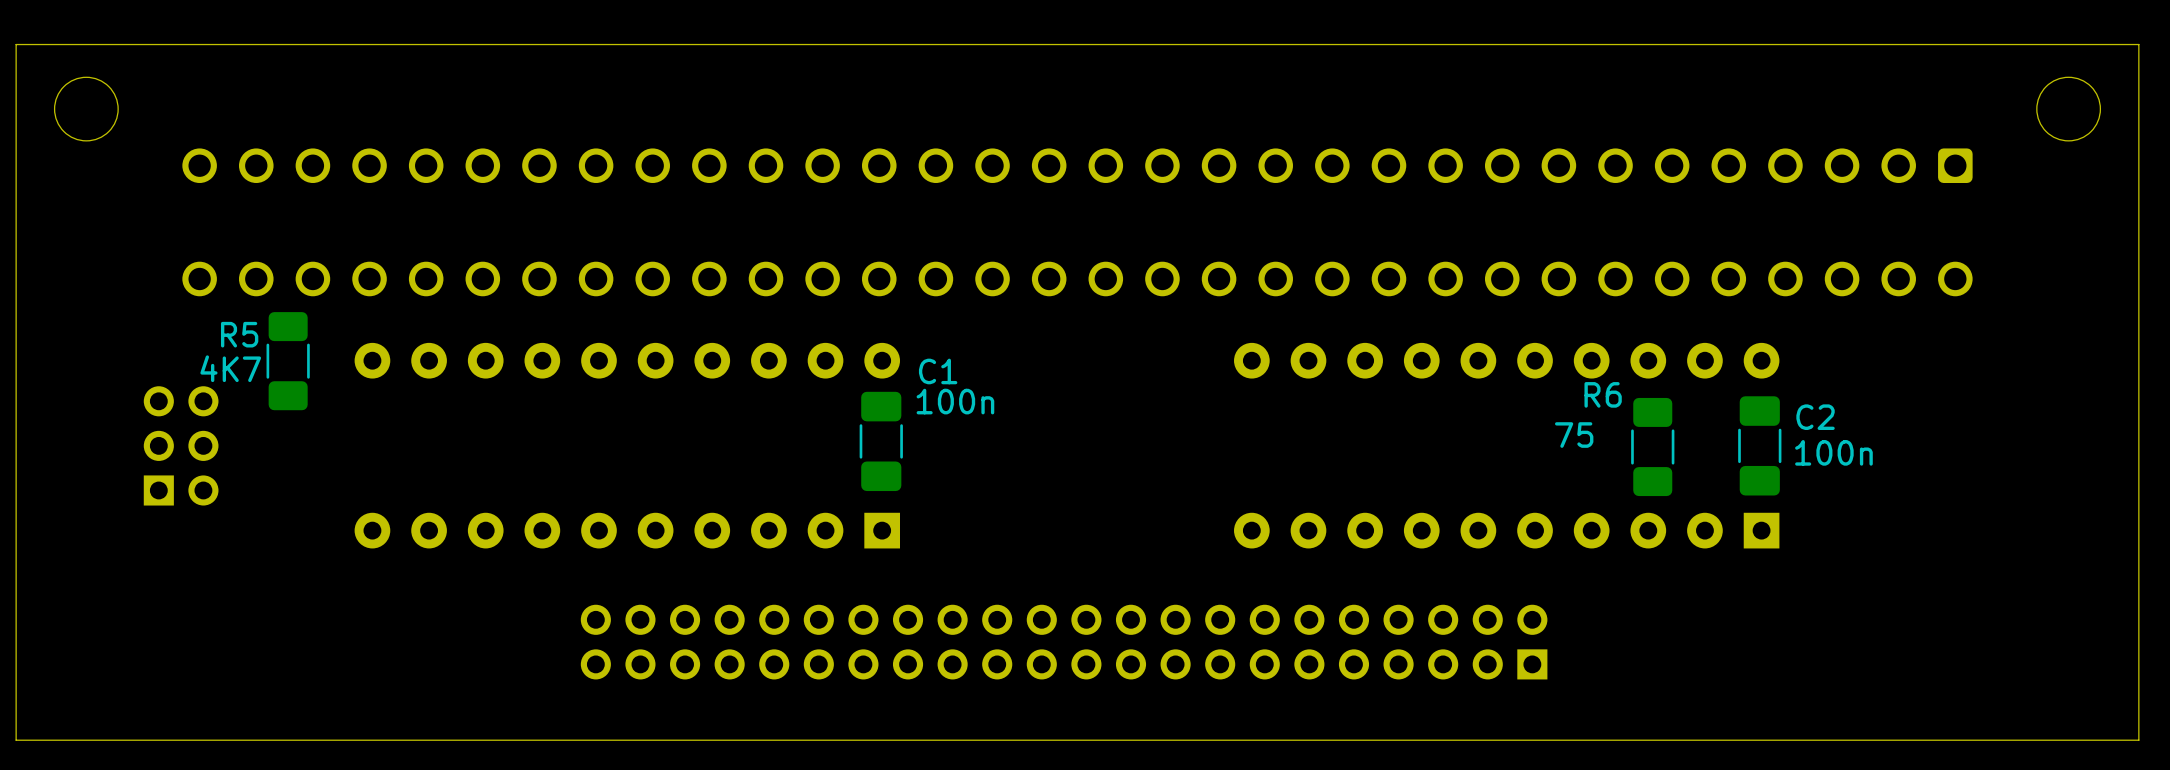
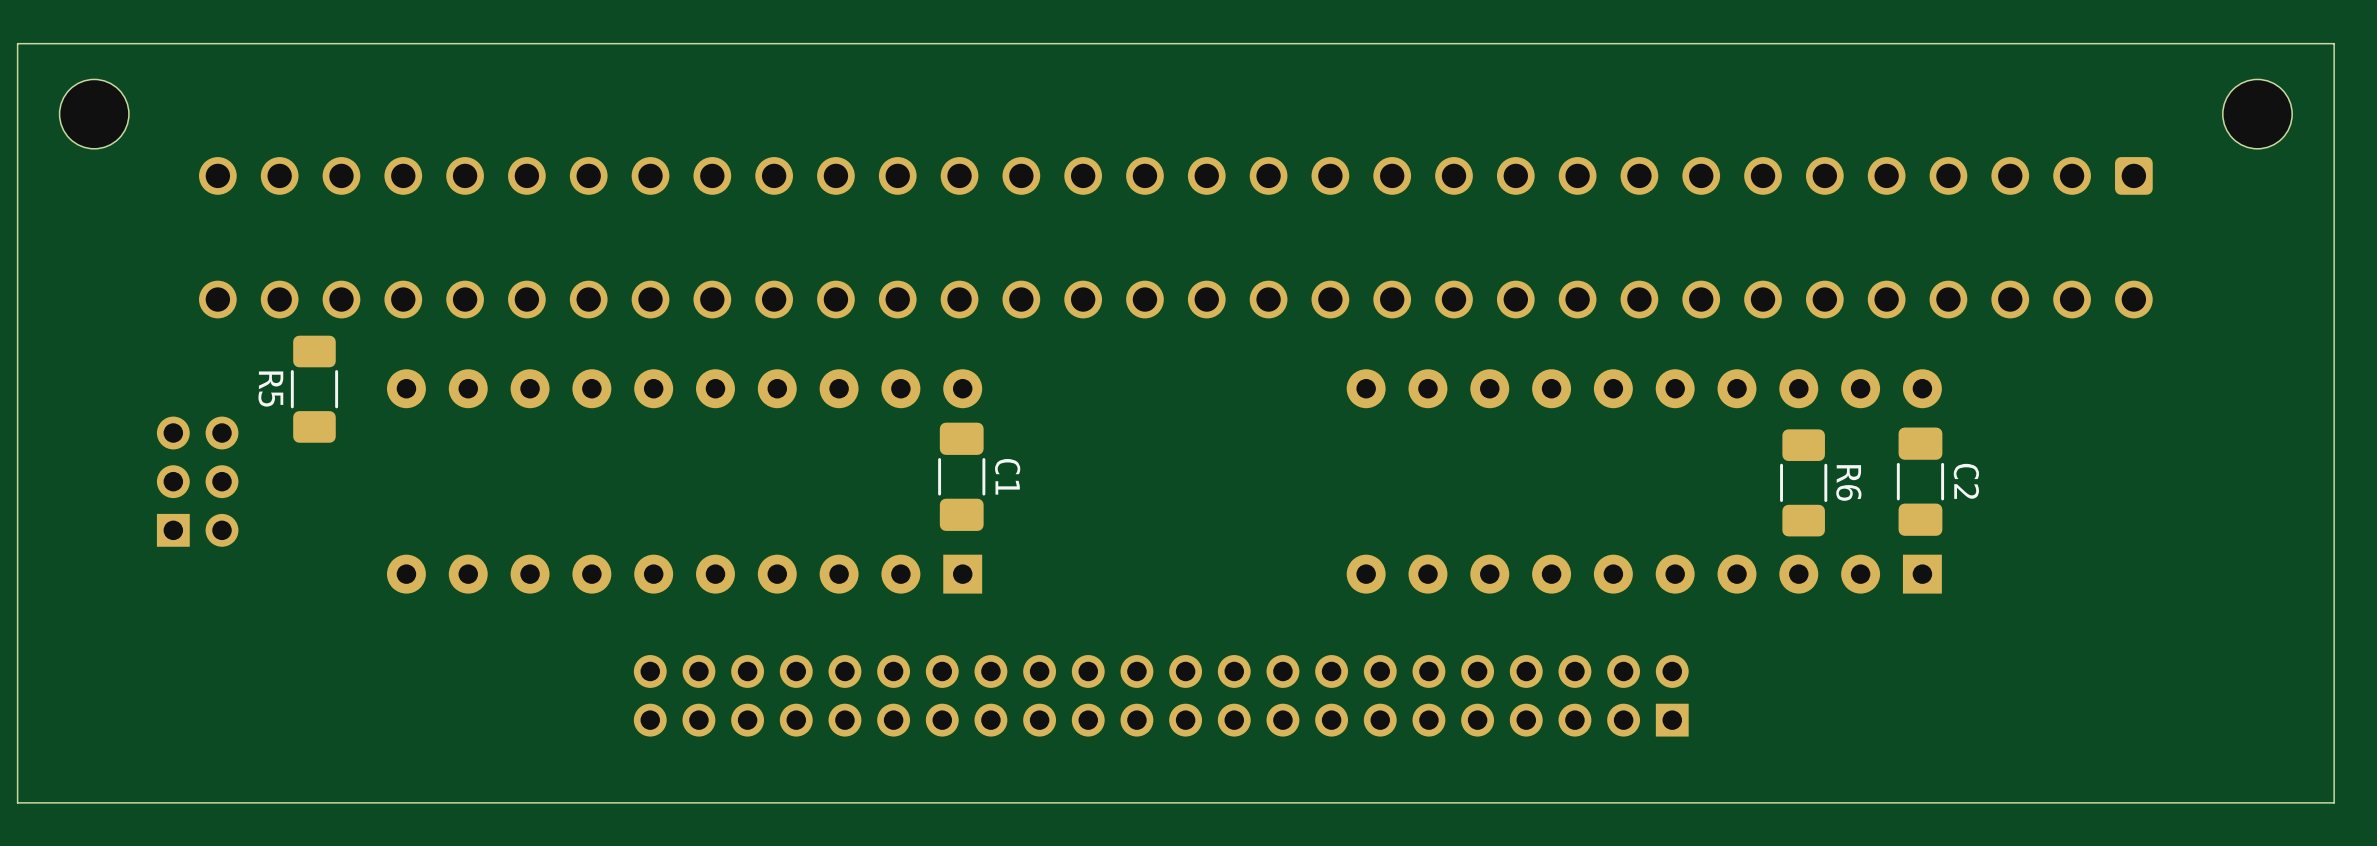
R5 name rotation: 0° (239, 334) -> 90° clockwise (270, 389)
R5 value: 4K7 (230, 368) -> none
C1 name rotation: 0° (938, 371) -> 90° clockwise (1007, 476)
C1 name position: C1 (938, 371) -> C1 (1007, 476)
R6 name rotation: 0° (1603, 394) -> 90° clockwise (1848, 482)
R6 name position: R6 (1603, 394) -> R6 (1848, 482)
C1 value: 100n (955, 401) -> none
C2 name rotation: 0° (1815, 417) -> 90° clockwise (1966, 481)
R6 value: 75 (1574, 435) -> none
C2 value: 100n (1833, 452) -> none

